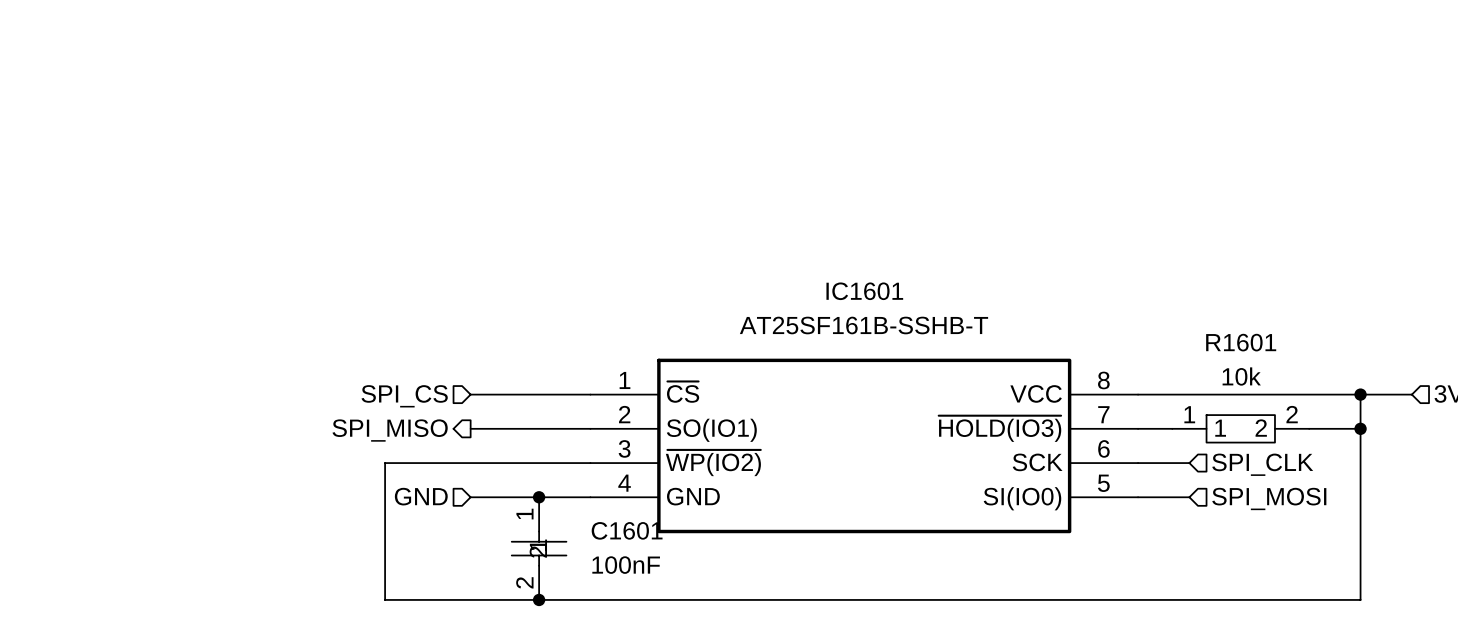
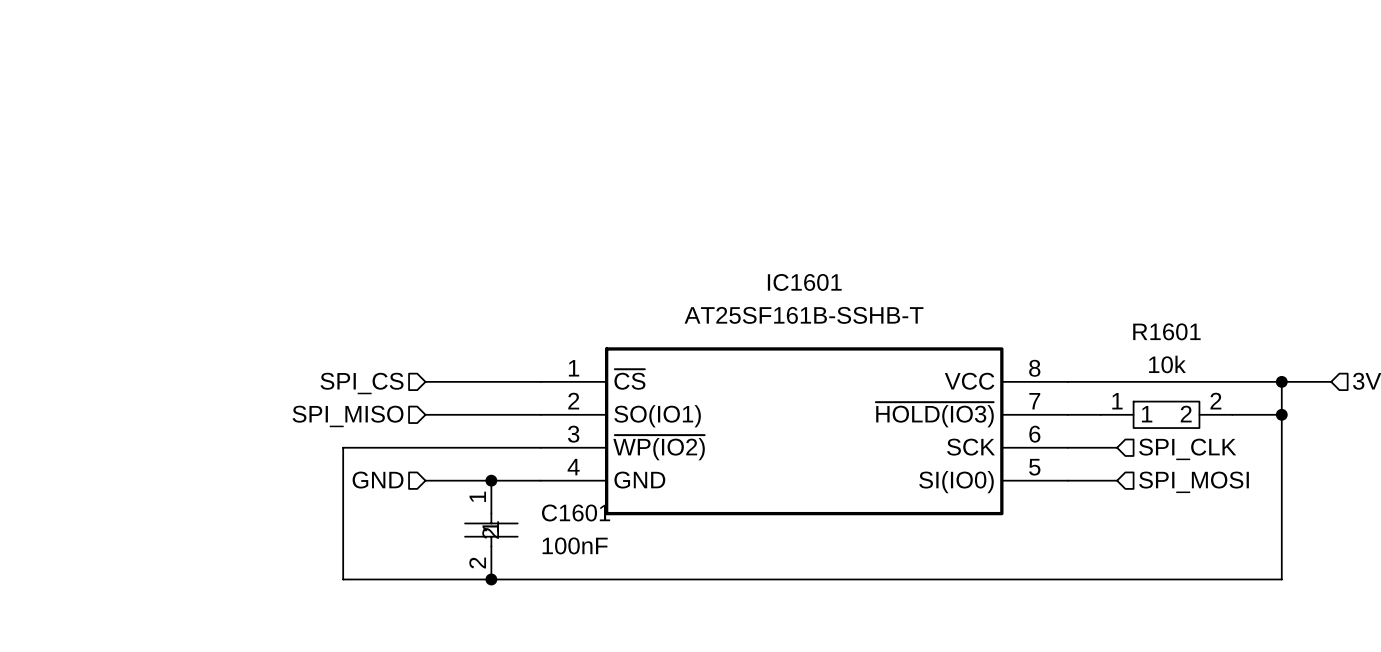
hierarchical label shape: output (390, 430) -> input (348, 416)

